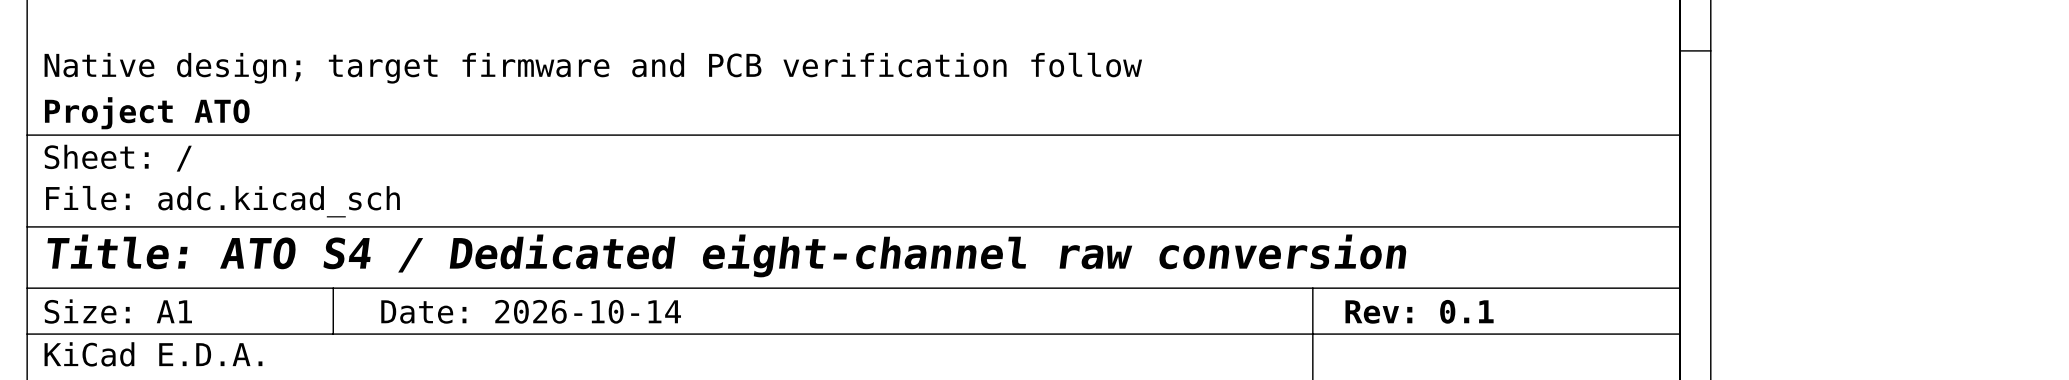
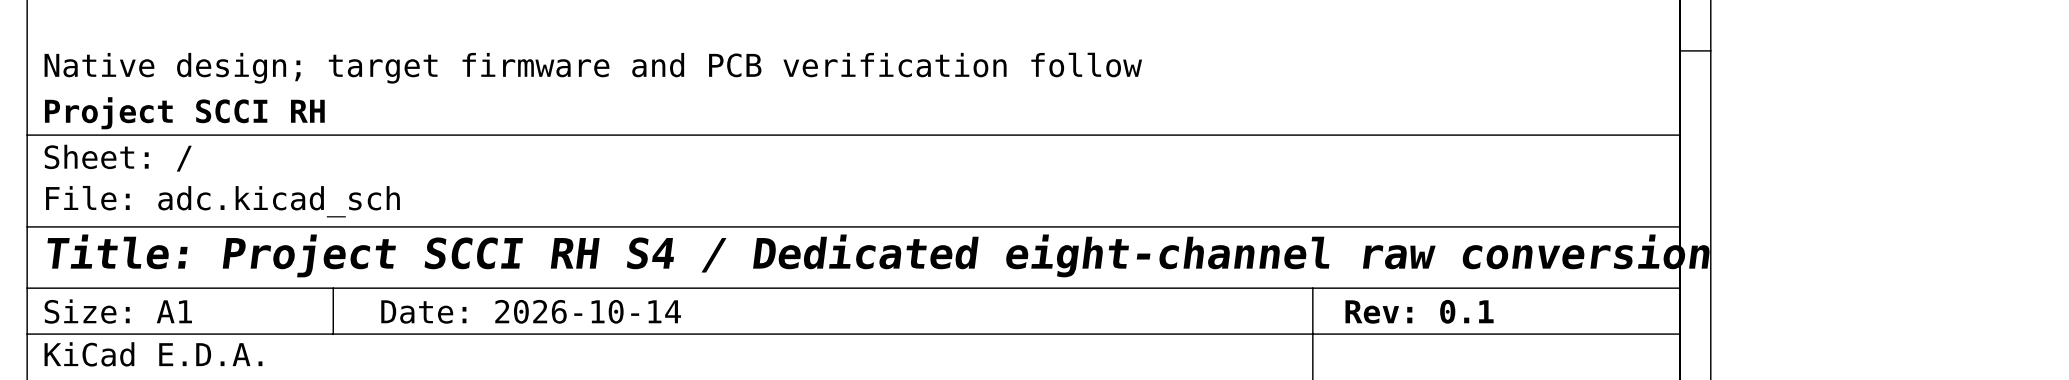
title block: Project ATO (147, 113) -> Project SCCI RH (184, 113)
title block: Title: ATO S4 / Dedicated eight-channel raw conversion (727, 255) -> Title: Project SCCI RH S4 / Dedicated eight-channel raw conversion (878, 255)

